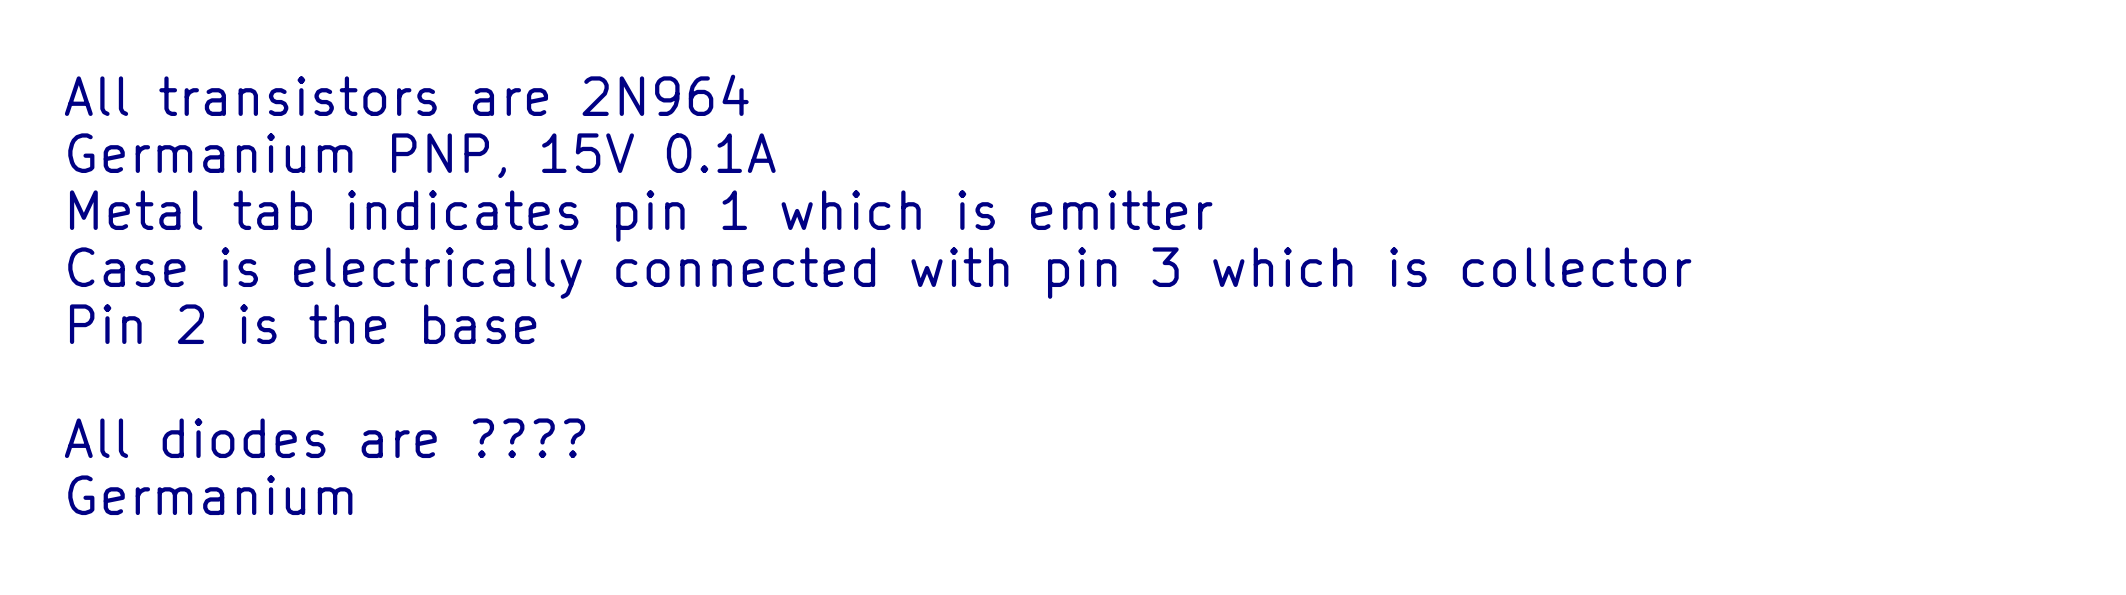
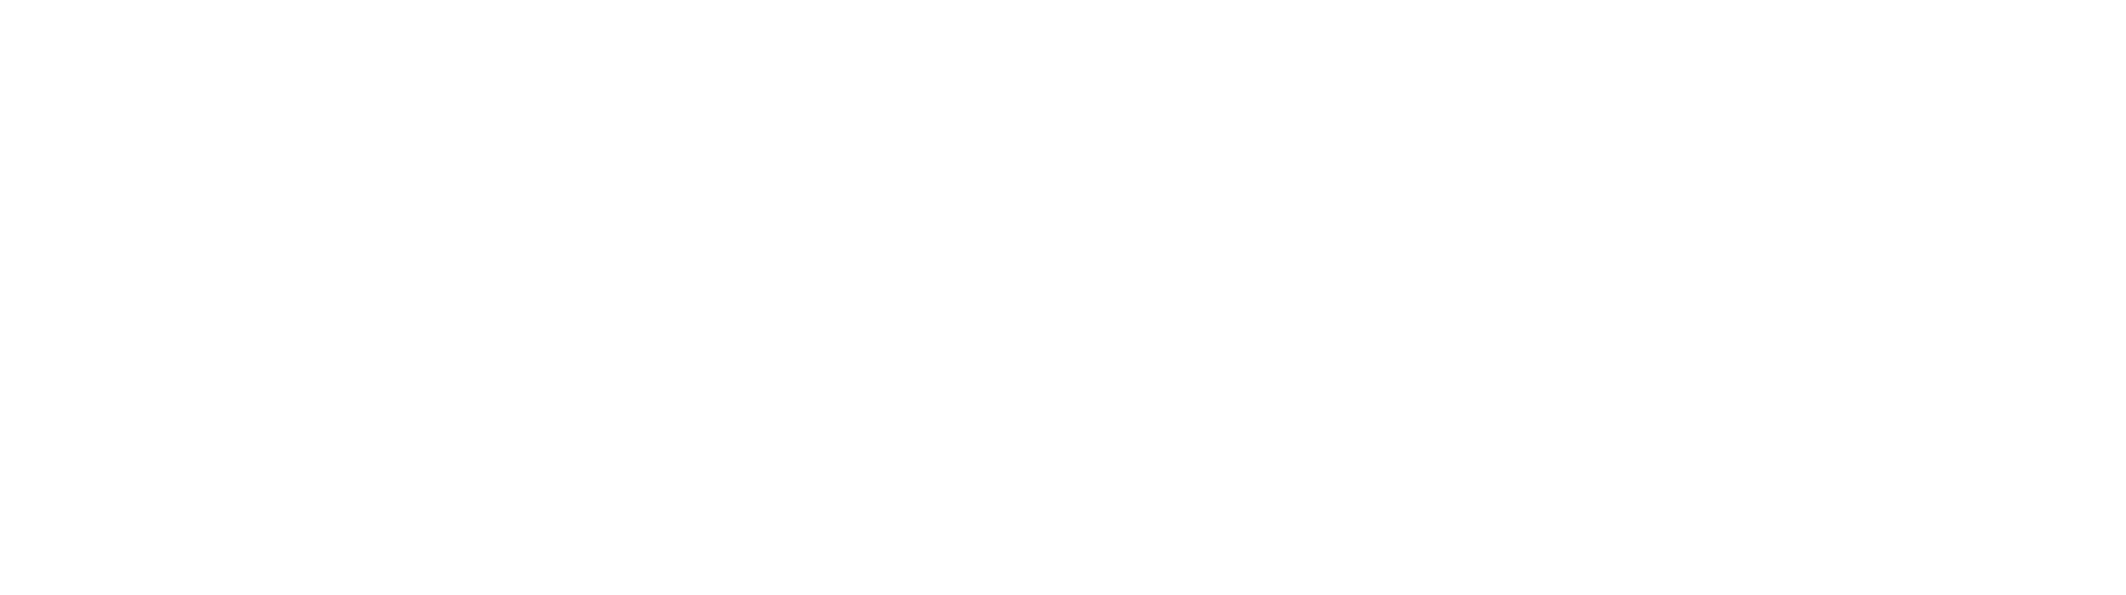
text: All transistors are 2N964 (406, 95) -> none
text: Germanium PNP, 15V 0.1A (421, 155) -> none
text: Metal tab indicates pin 1 which is emitter (641, 216) -> none
text: Case is electrically connected with pin 3 which is collector (879, 273) -> none
text: Pin 2 is the base (303, 324) -> none
text: All diodes are ???? (325, 438) -> none
text: Germanium (210, 495) -> none

